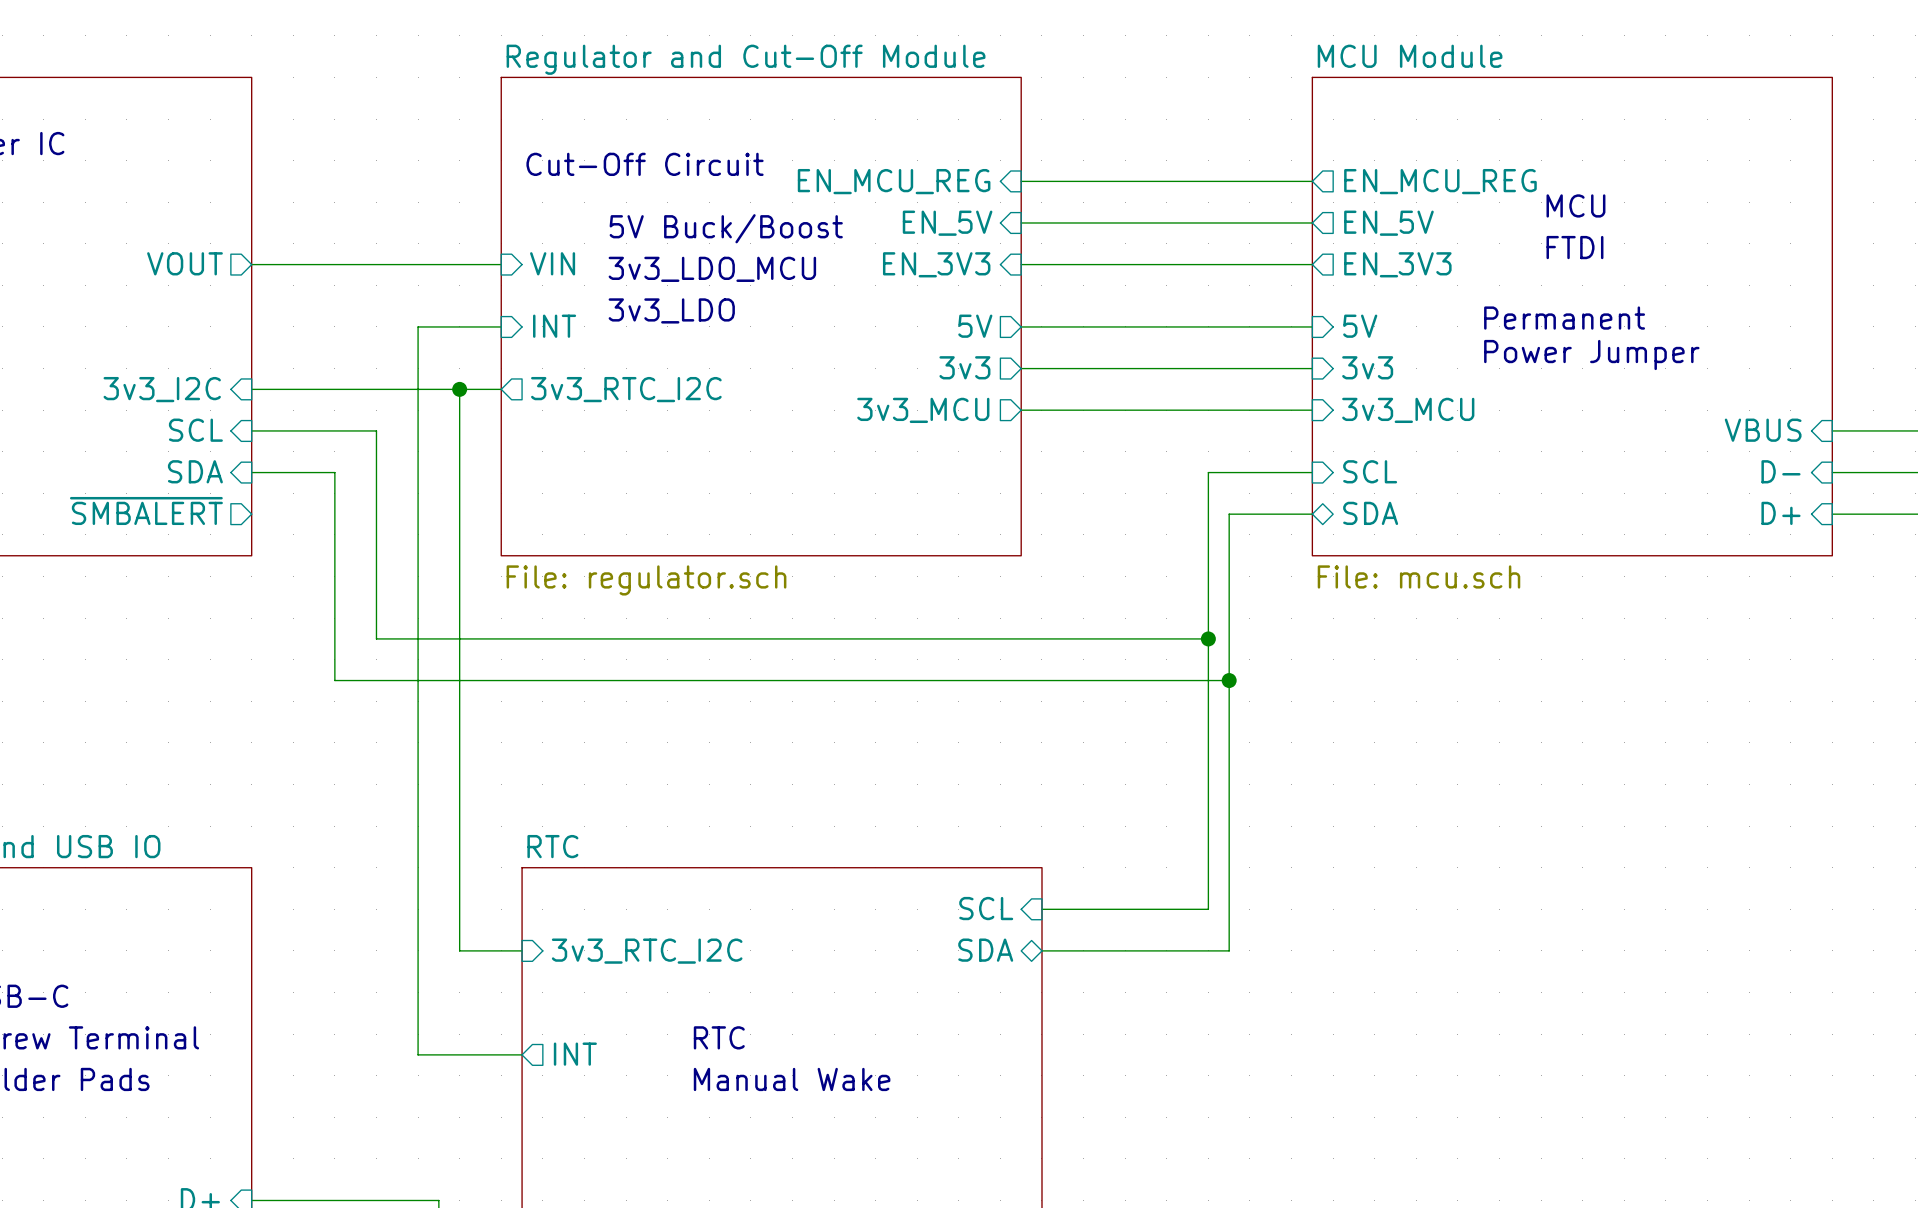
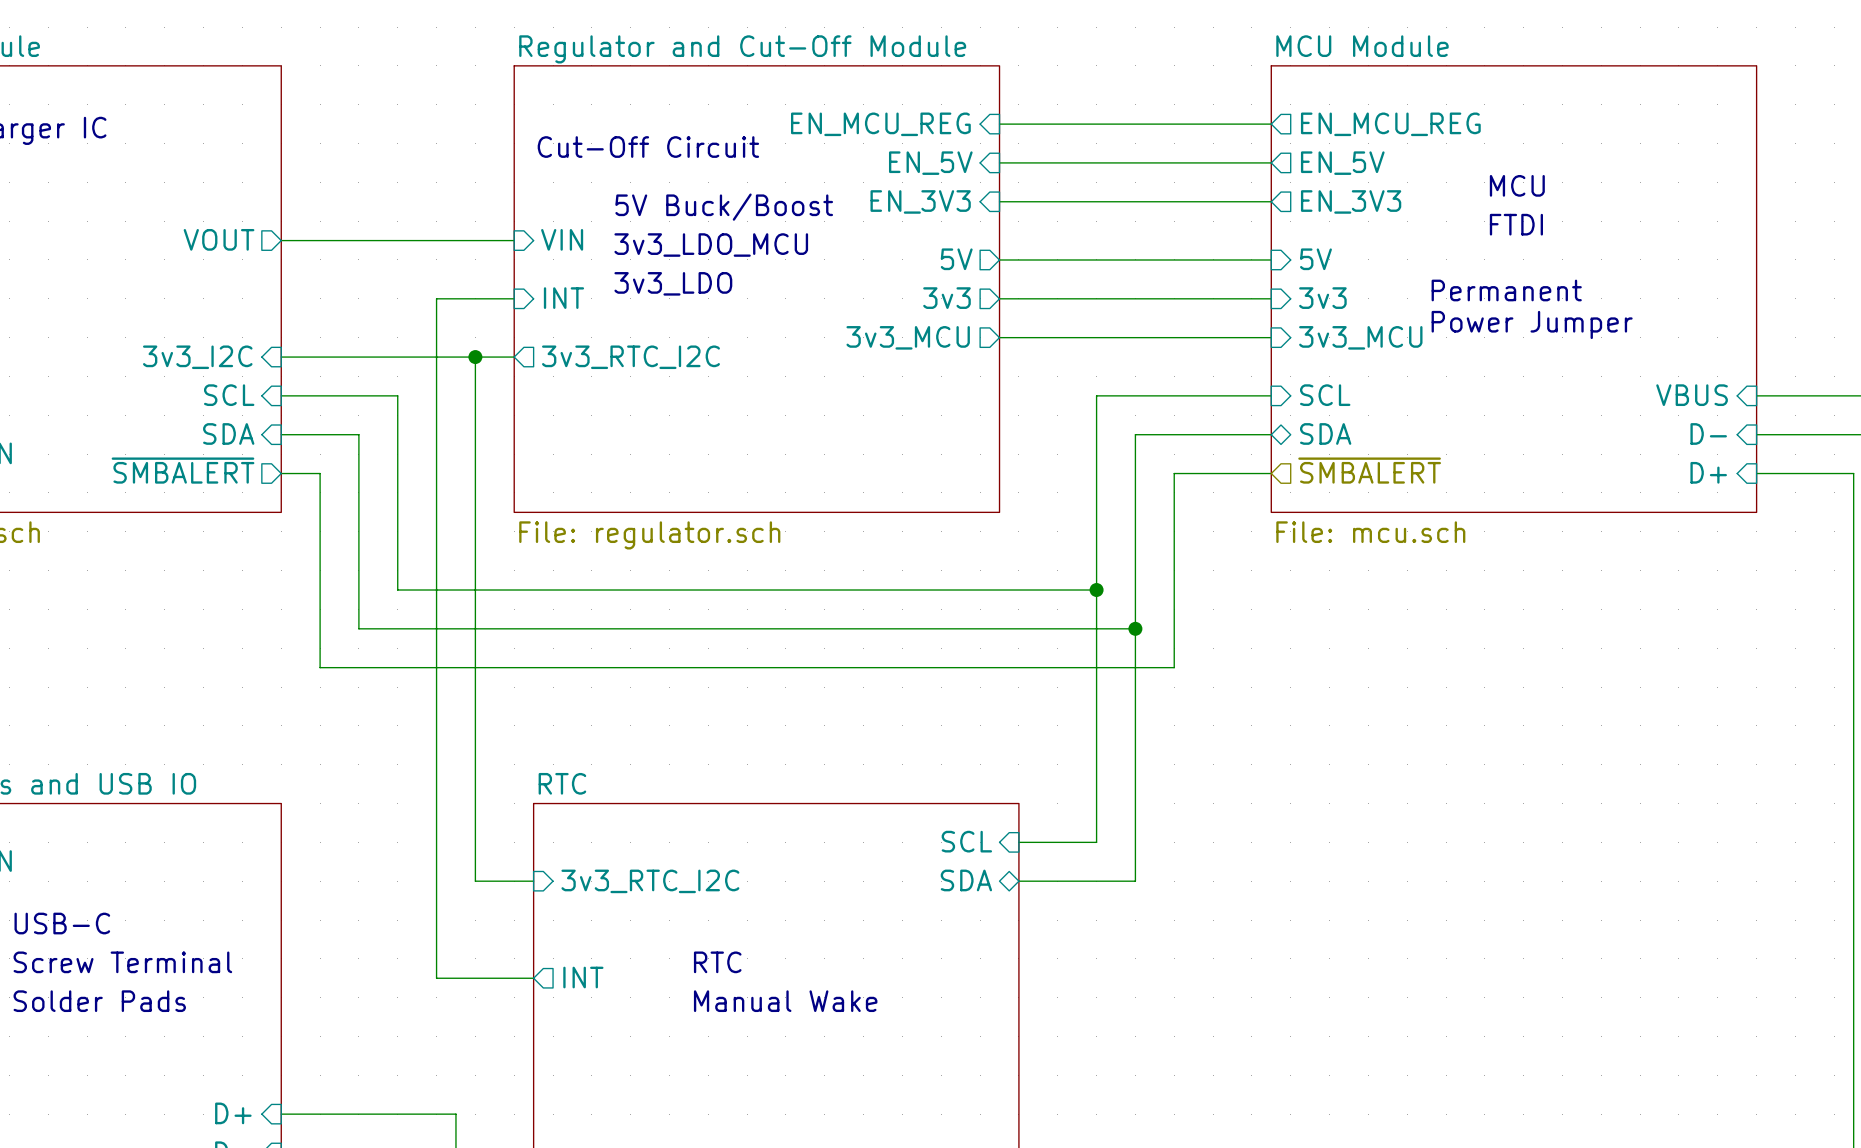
sheet pin: none -> EN_MCU_REG (880, 124)
sheet pin: none -> EN_MCU_REG (1390, 124)
sheet pin: EN_MCU_REG (894, 181) -> EN_5V (930, 163)
sheet pin: EN_MCU_REG (1440, 181) -> EN_5V (1342, 163)
sheet pin: EN_5V (947, 223) -> EN_3V3 (920, 201)
sheet pin: EN_5V (1388, 223) -> EN_3V3 (1351, 201)
sheet pin: EN_3V3 (936, 264) -> none
wire: (1021, 264) (1312, 264) -> (999, 124) (1271, 124)
sheet pin: EN_3V3 (1397, 264) -> none
sheet pin: none -> 5V (956, 259)
sheet pin: none -> 5V (1315, 259)
sheet pin: 5V (975, 326) -> 3v3 (946, 298)
sheet pin: 5V (1360, 326) -> 3v3 (1322, 298)
sheet pin: 3v3 (964, 367) -> 3v3_MCU (908, 337)
sheet pin: 3v3 (1367, 367) -> 3v3_MCU (1360, 337)
sheet pin: 3v3_MCU (923, 410) -> none
wire: (1021, 410) (1312, 410) -> (999, 259) (1271, 259)
sheet pin: 3v3_MCU (1408, 410) -> none
sheet pin: none -> SCL (1325, 395)
sheet pin shape: input (1370, 471) -> bidirectional (1325, 433)
sheet pin: SCL (1370, 471) -> SDA (1325, 433)
wire: (1208, 472) (1208, 514) -> (1193, 473) (1174, 473)
hierarchical label: none -> ~{SMBALERT} (1369, 470)
sheet pin: SDA (1370, 513) -> none
wire: none -> (281, 473) (320, 473) (320, 667) (1174, 667)
wire: (1229, 514) (1229, 950) (1166, 950) -> (1174, 434) (1135, 434) (1135, 881)
wire: (1125, 638) (1208, 638) -> none
junction: none -> (1096, 590)
junction: (1208, 638) -> none
wire: (1166, 680) (1229, 680) -> none
junction: none -> (1135, 628)
junction: (1229, 680) -> none
wire: (1208, 722) (1208, 909) (1125, 909) -> (1271, 395) (1096, 395) (1096, 842)

